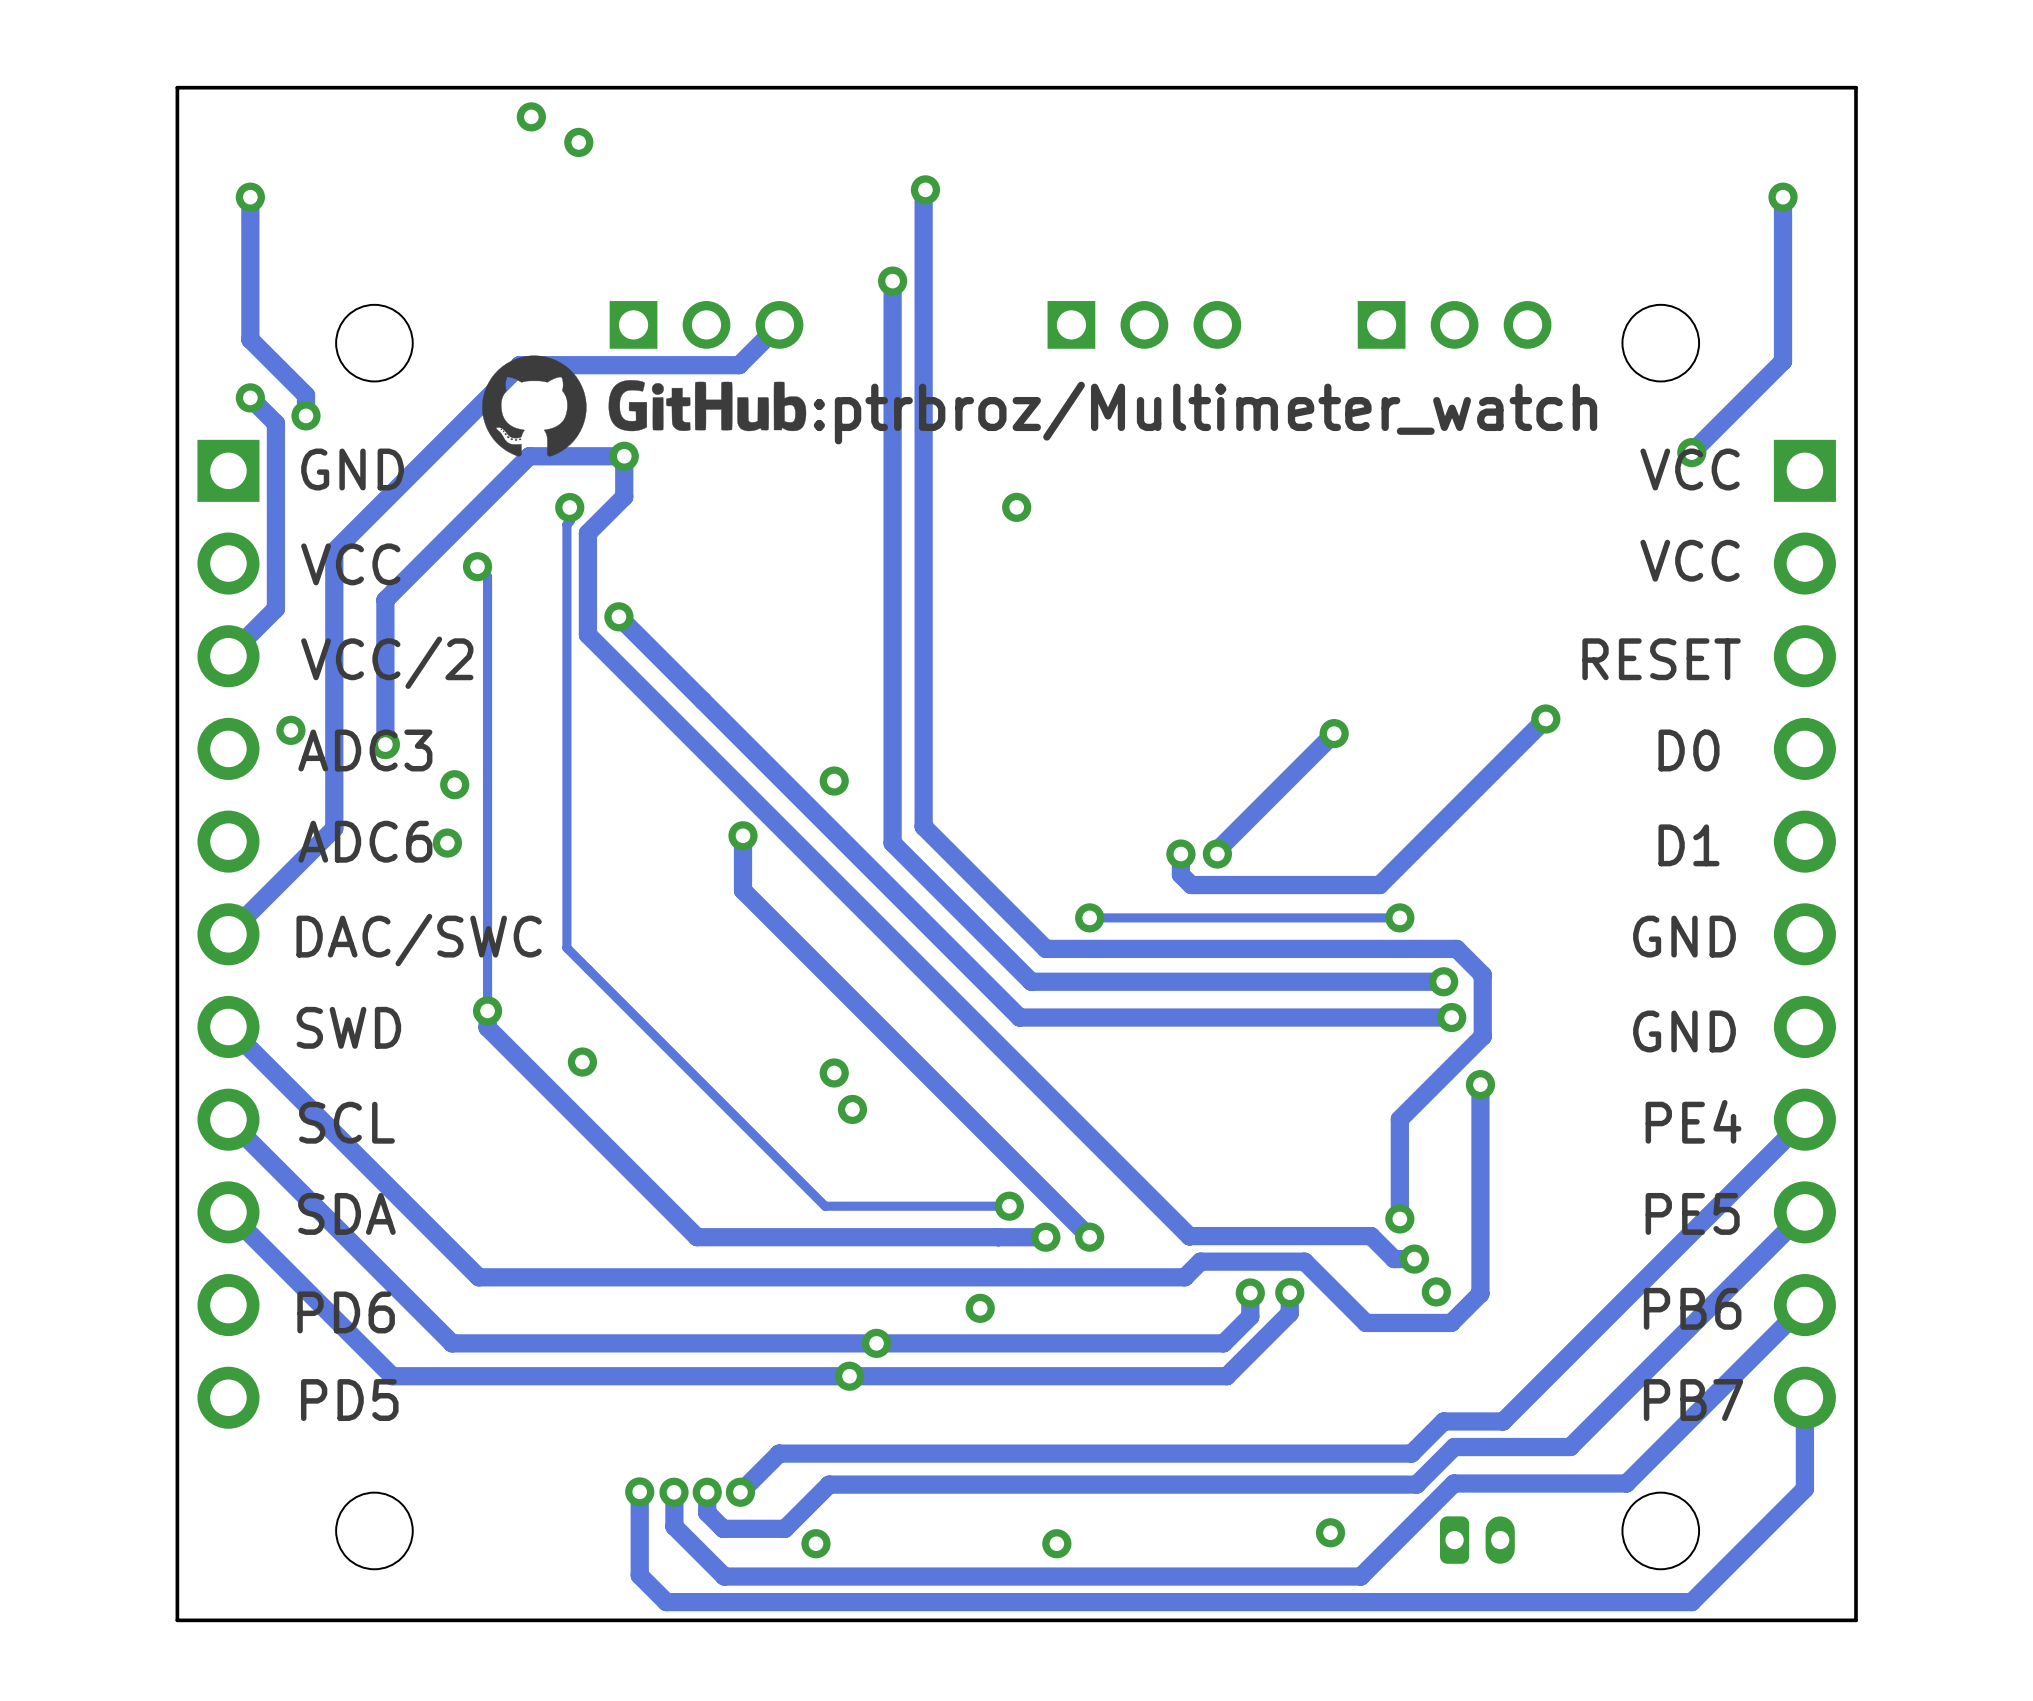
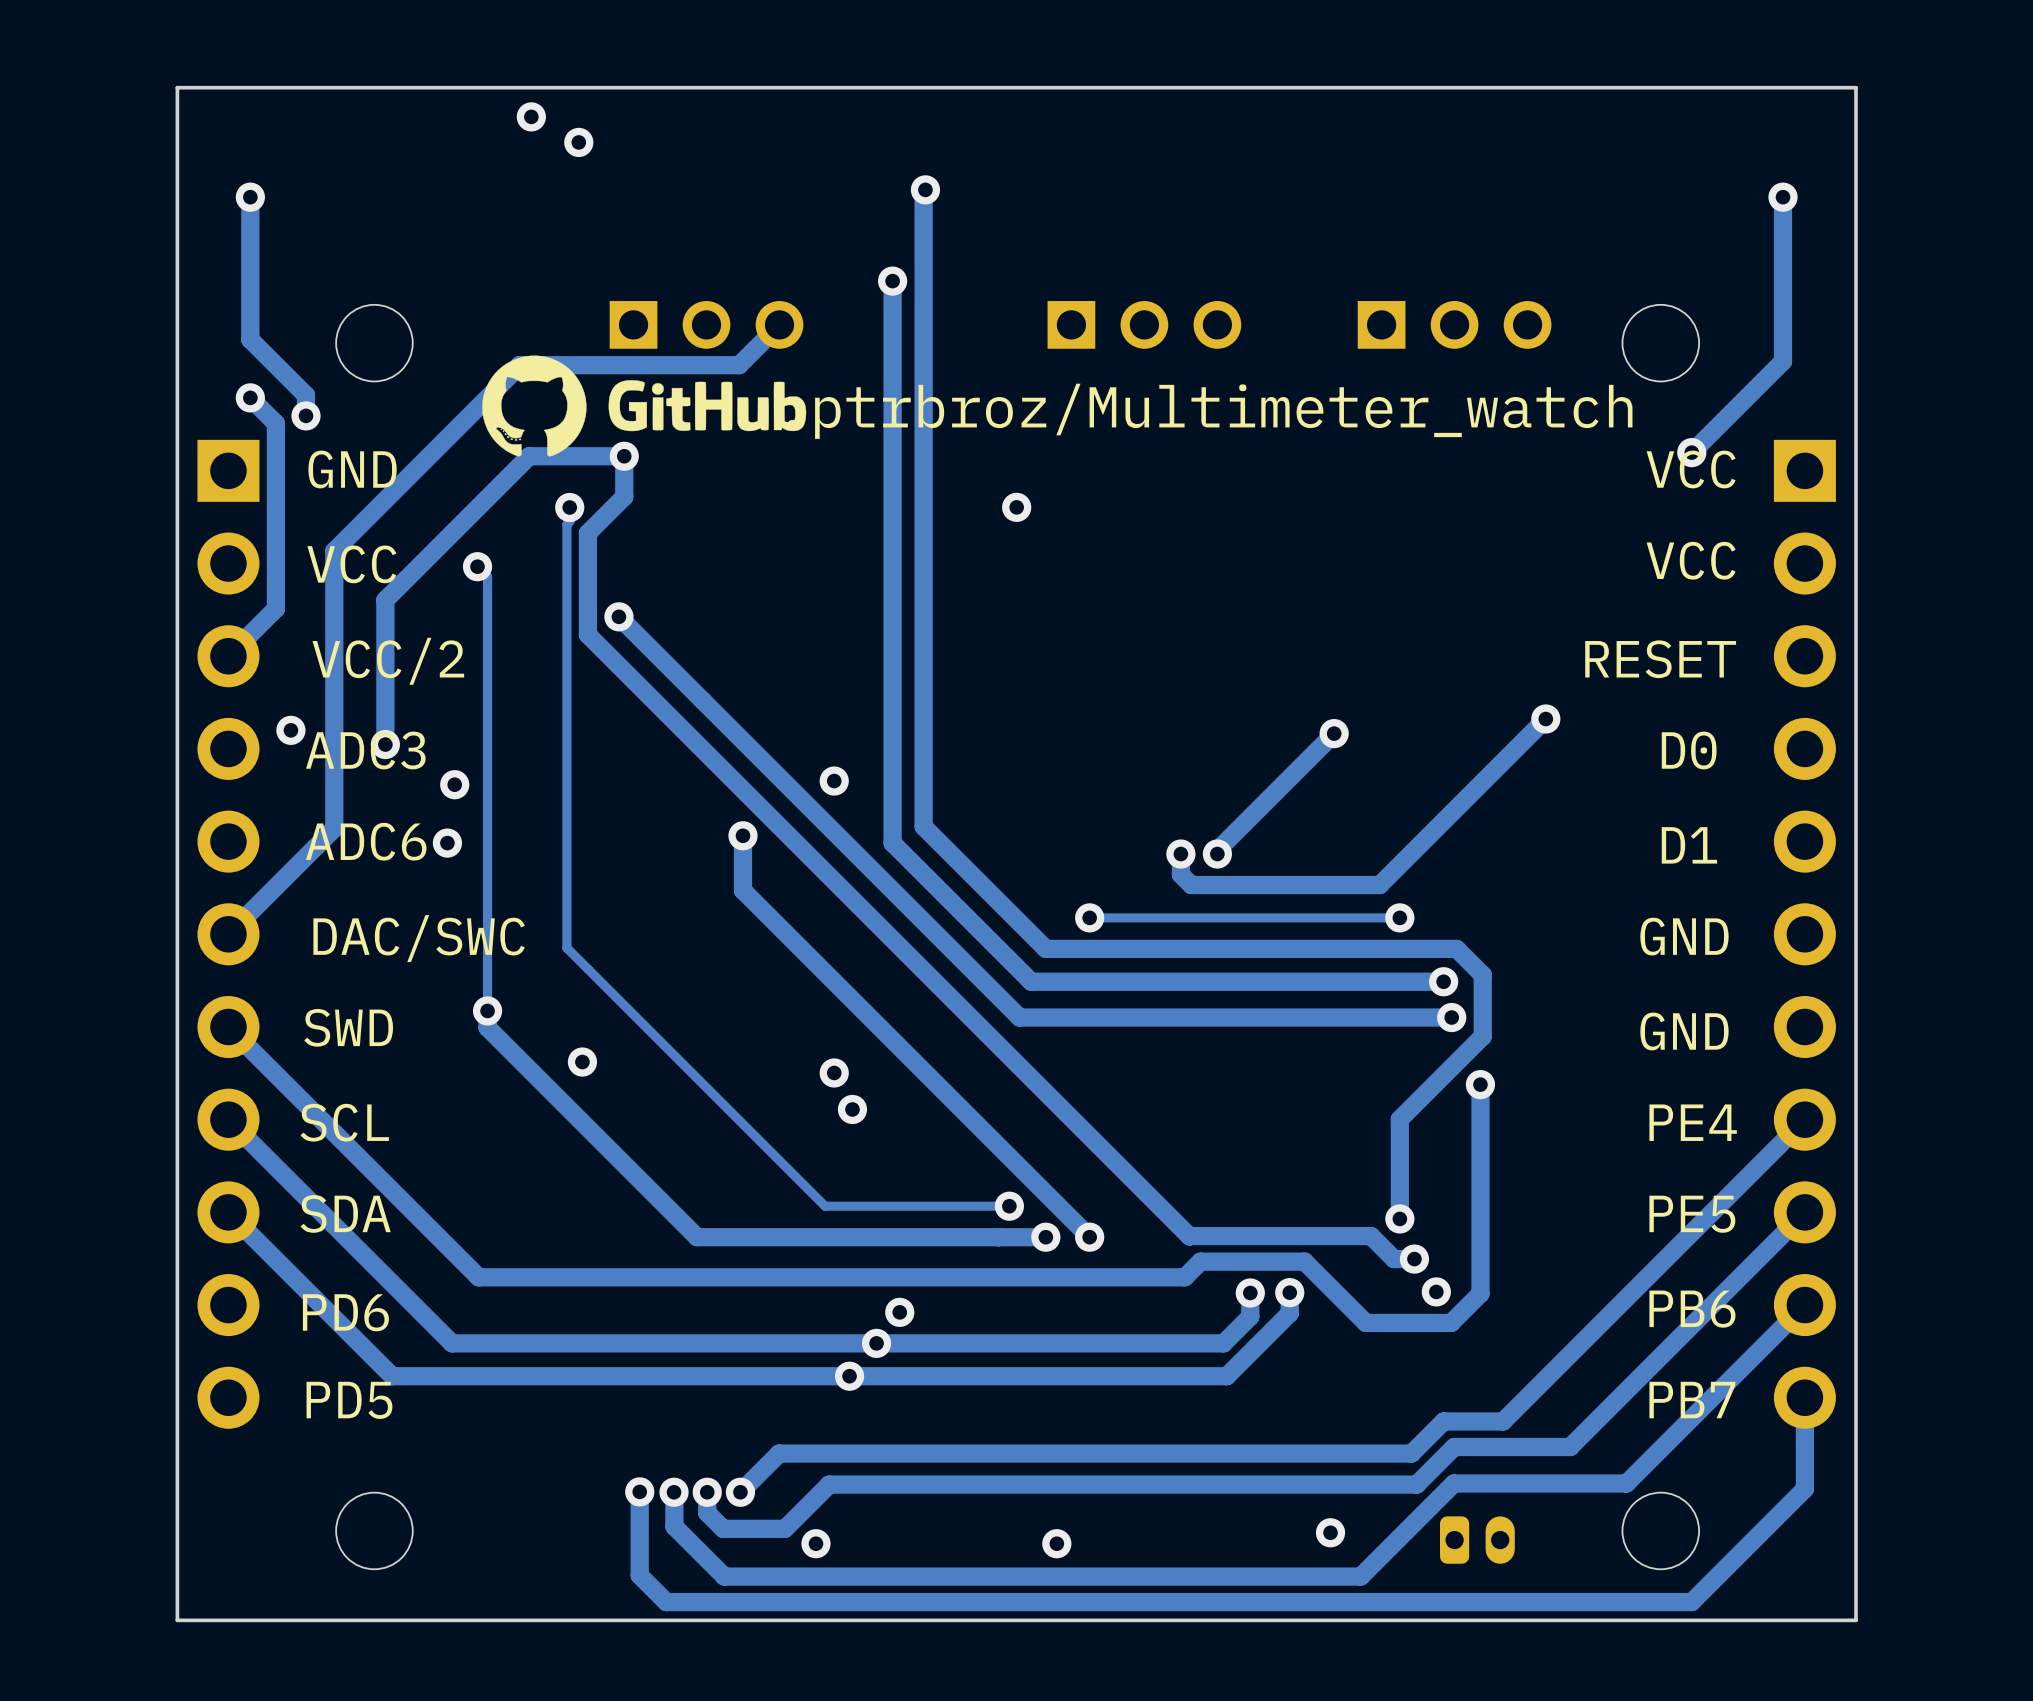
via position: (980, 1308) -> (899, 1312)

